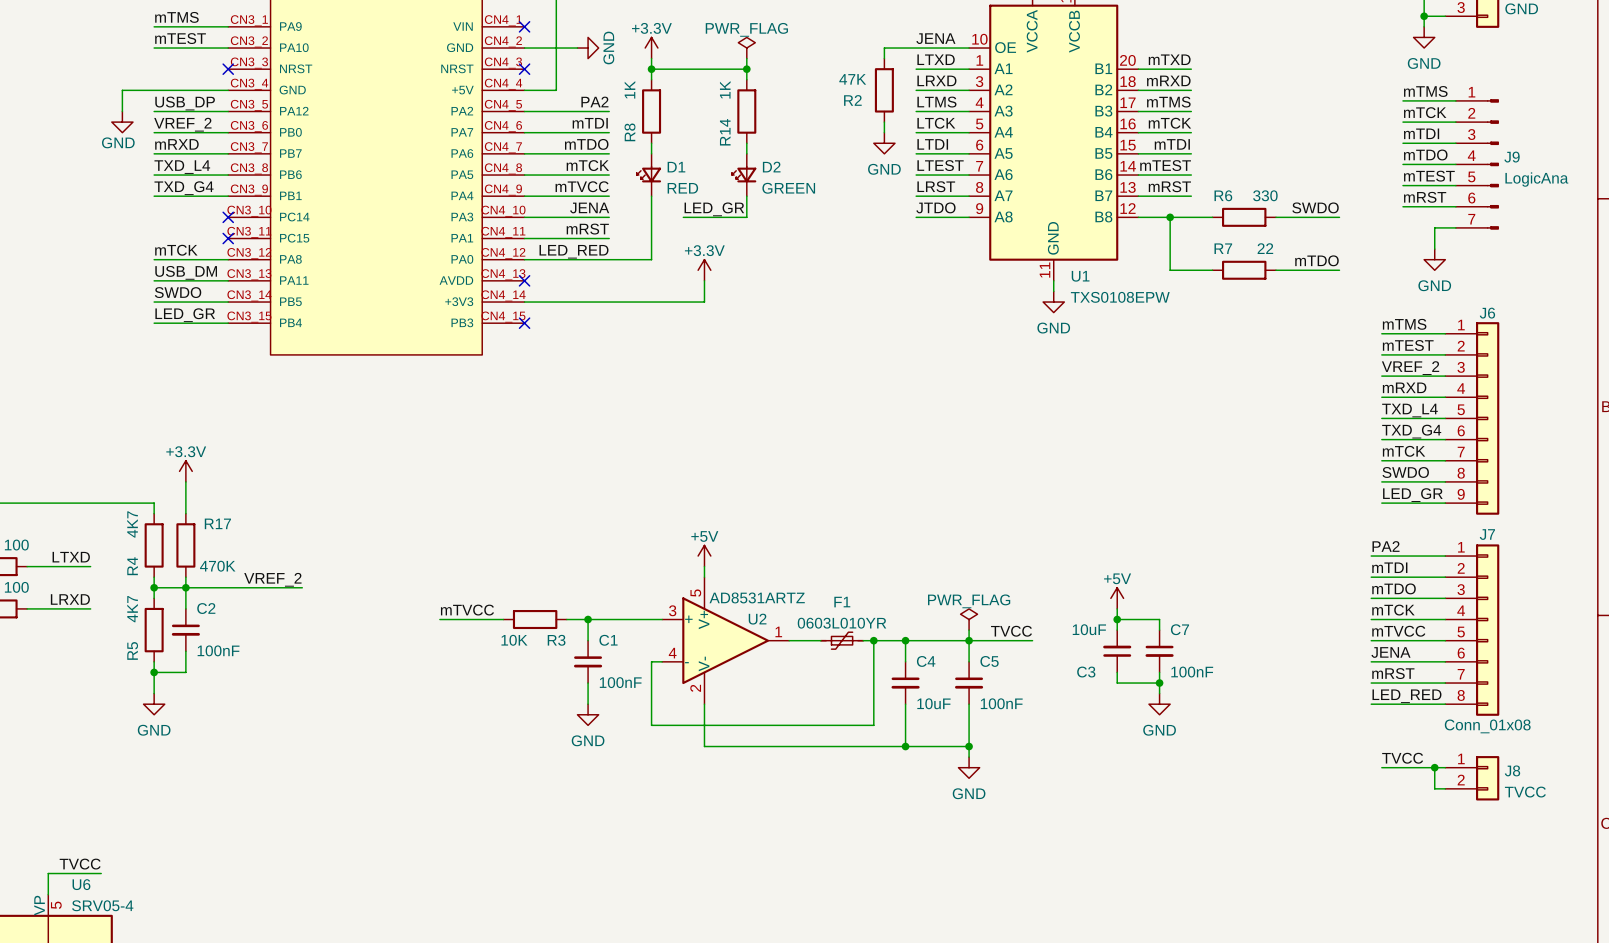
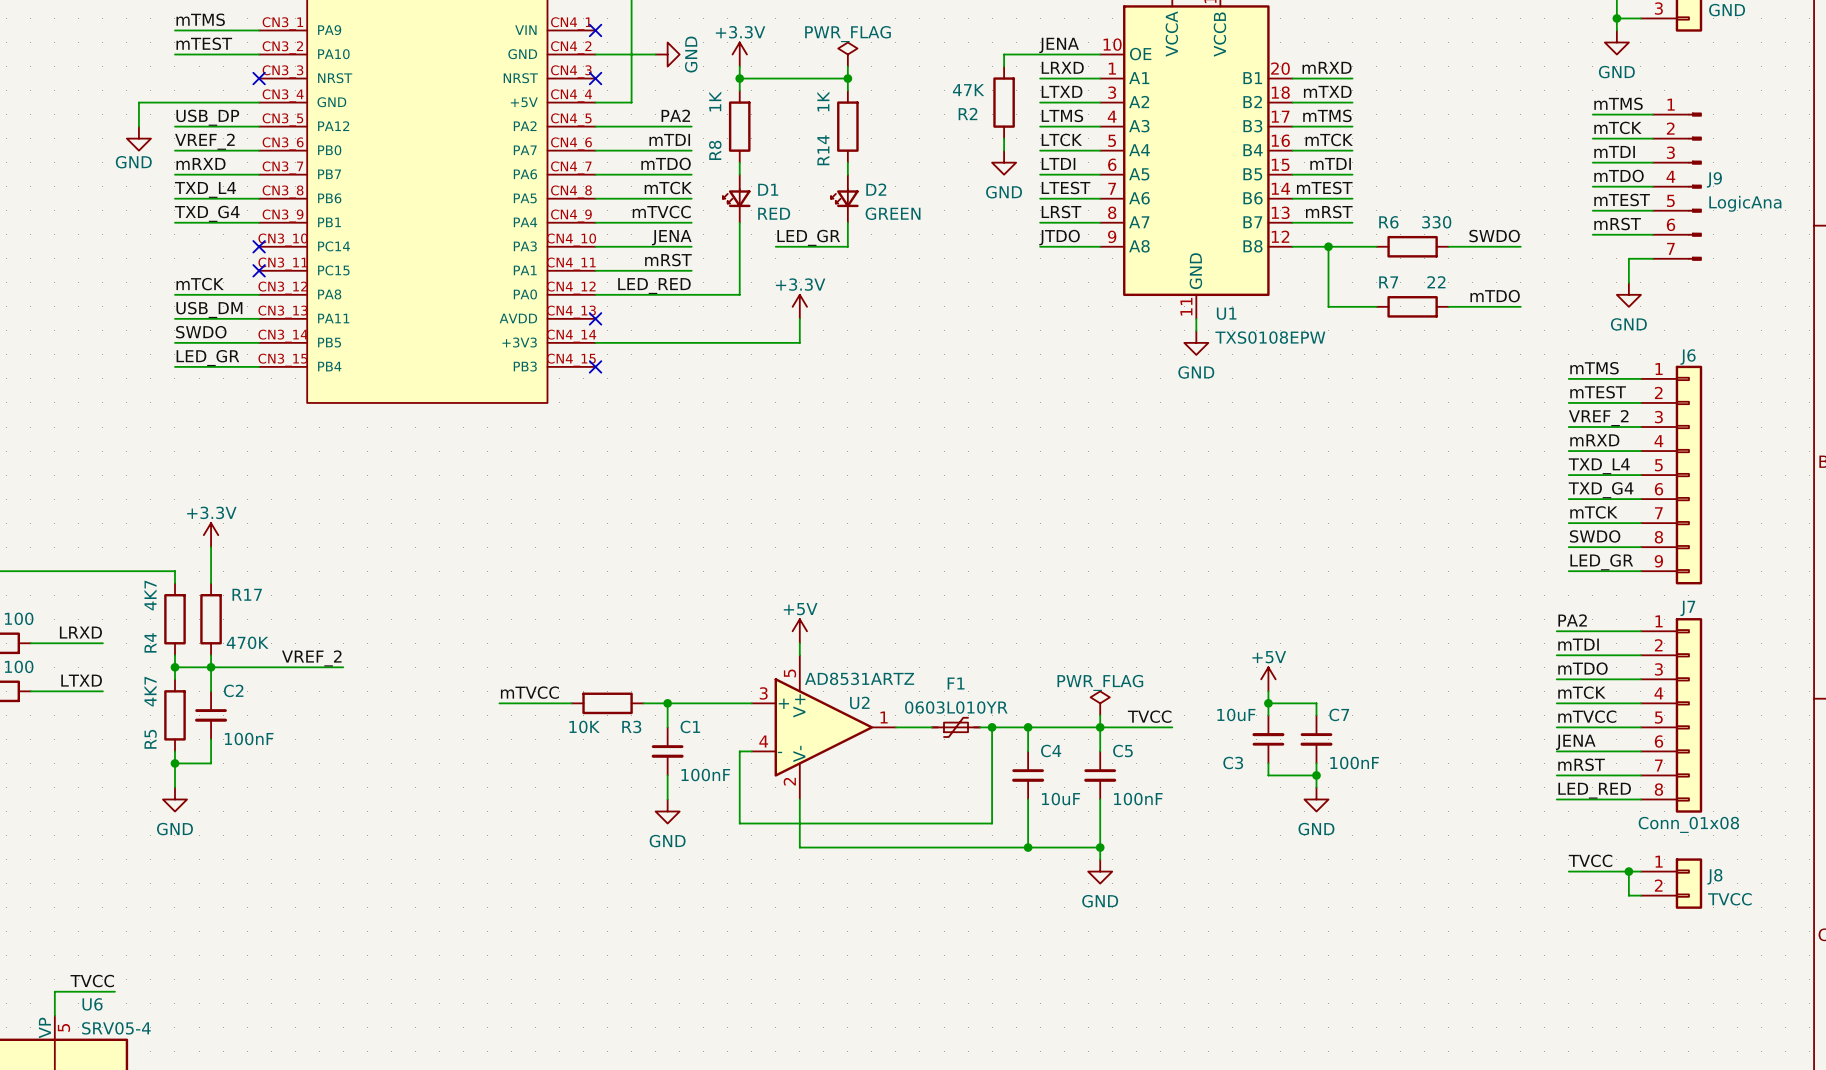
label: LTXD (936, 59) -> LRXD (1062, 67)
label: mTXD (1169, 59) -> mRXD (1327, 67)
label: LRXD (936, 80) -> LTXD (1062, 91)
label: mRXD (1168, 80) -> mTXD (1327, 91)
label: LTXD (71, 557) -> LRXD (80, 632)
label: LRXD (70, 599) -> LTXD (81, 680)

